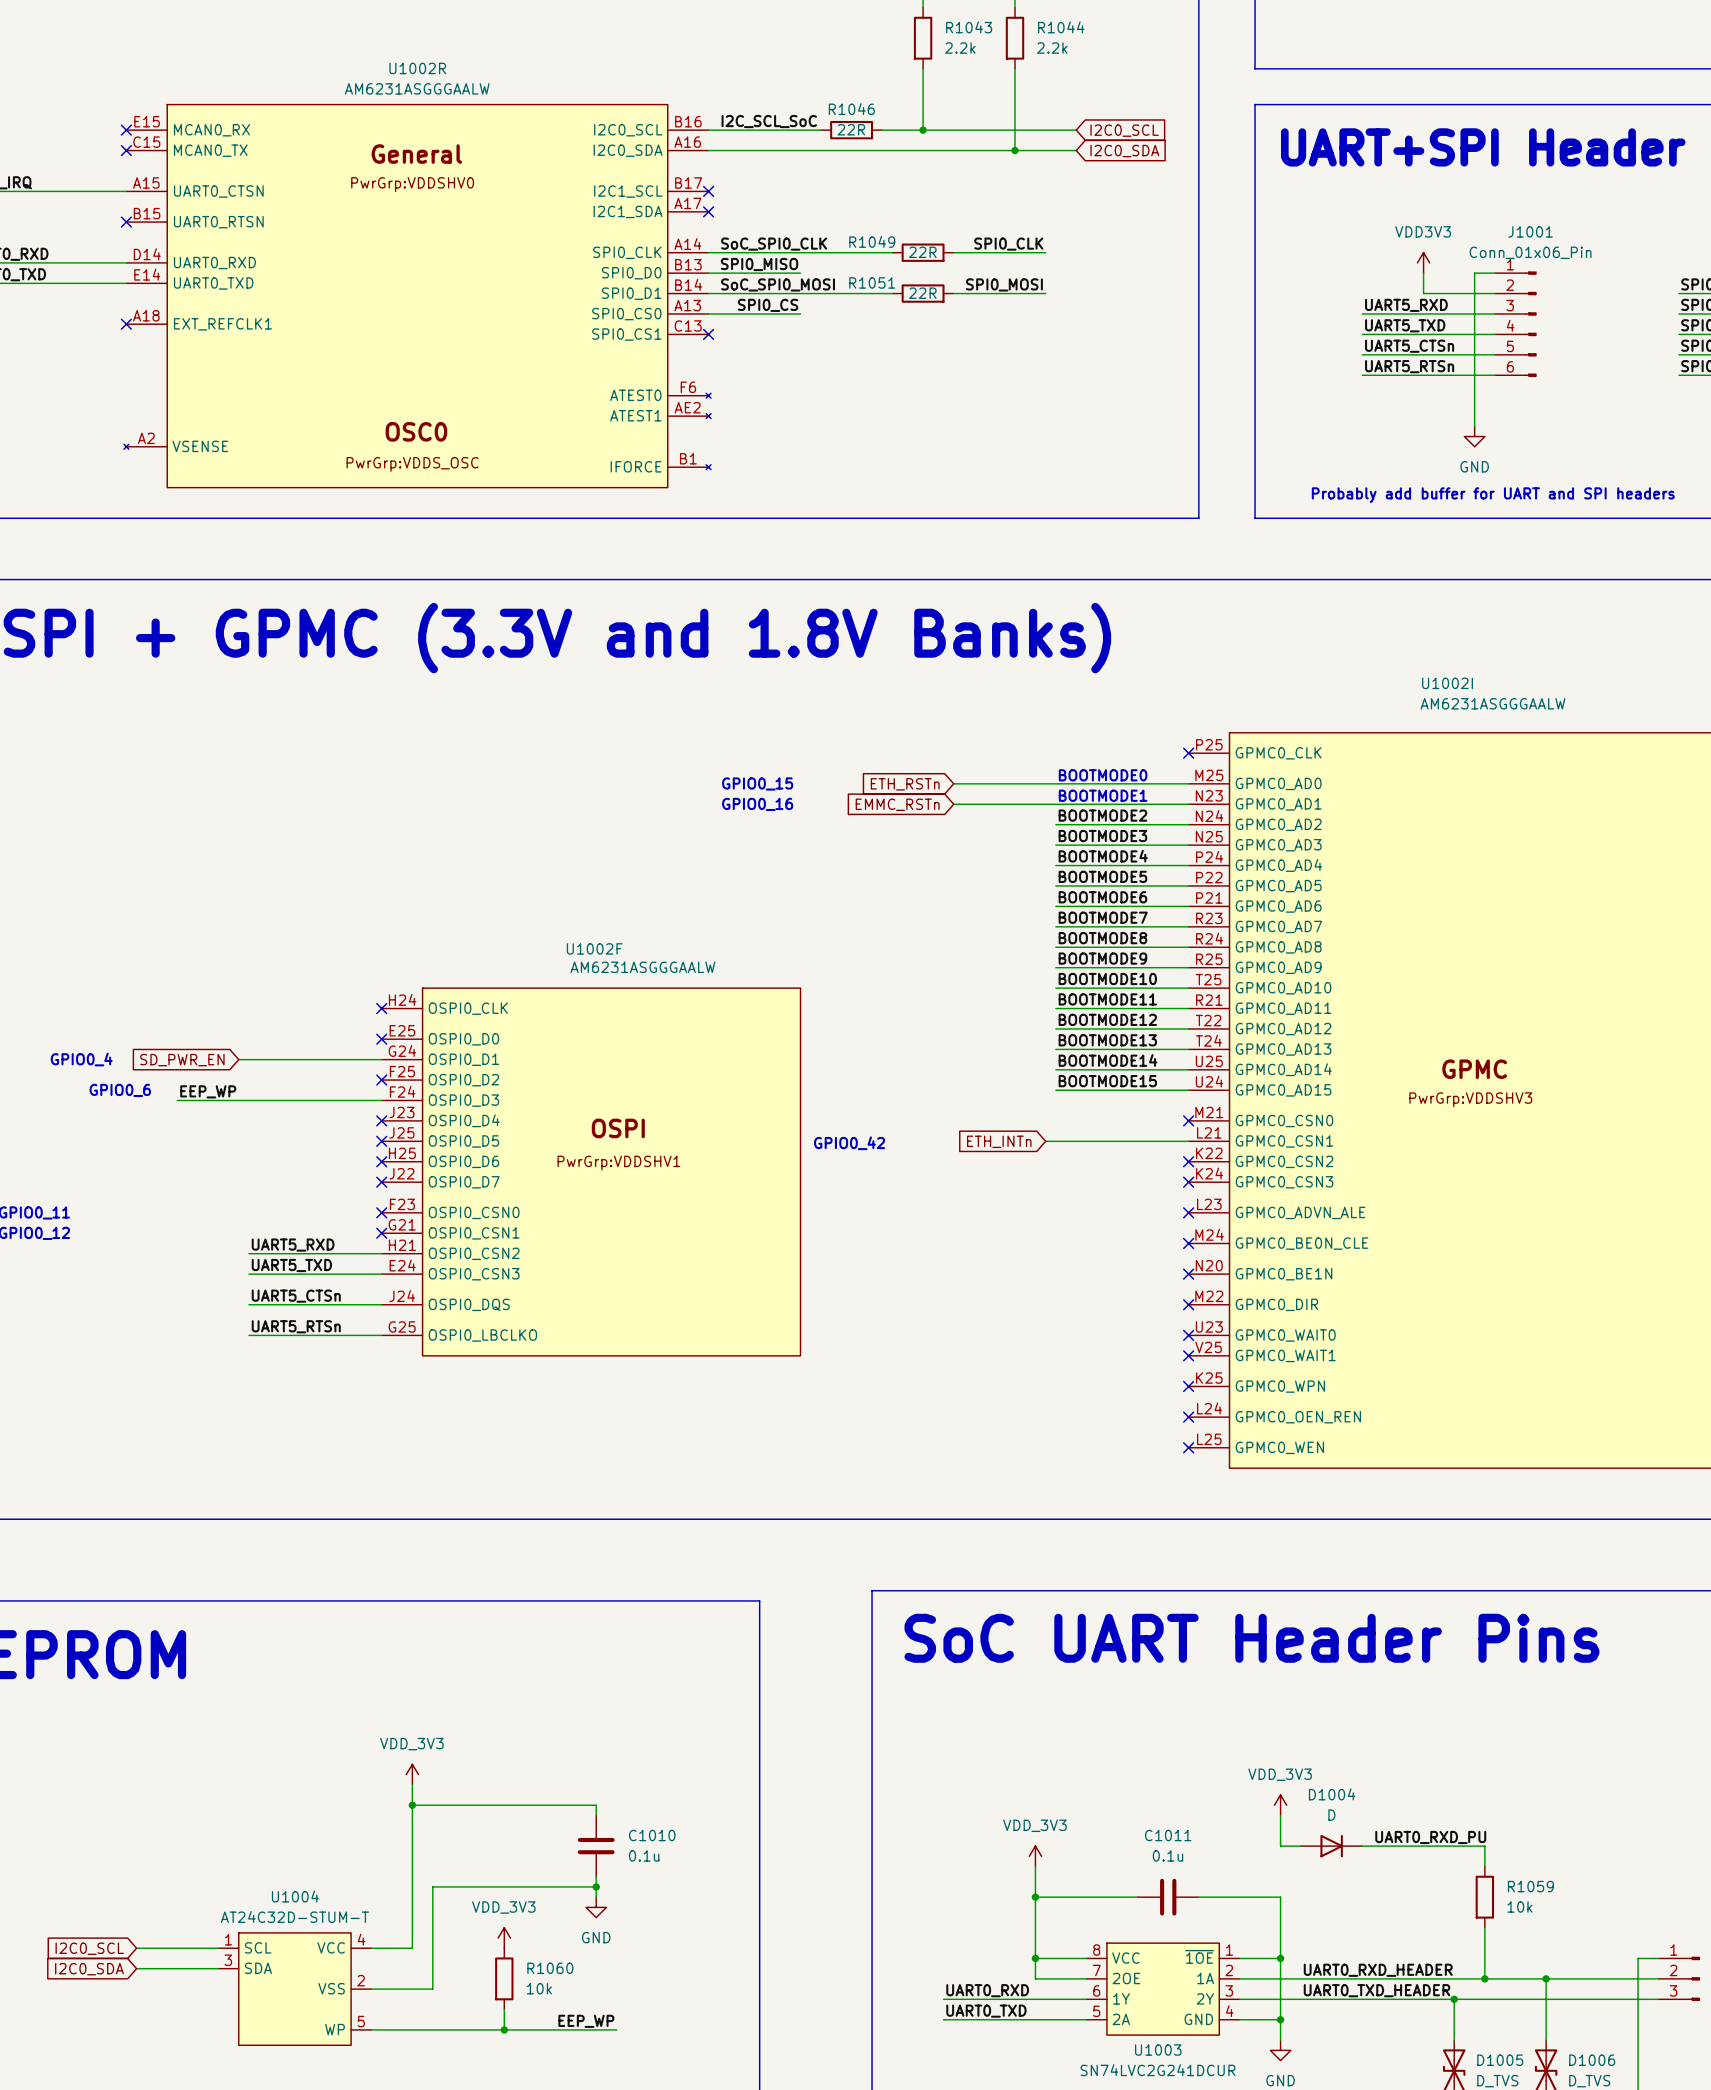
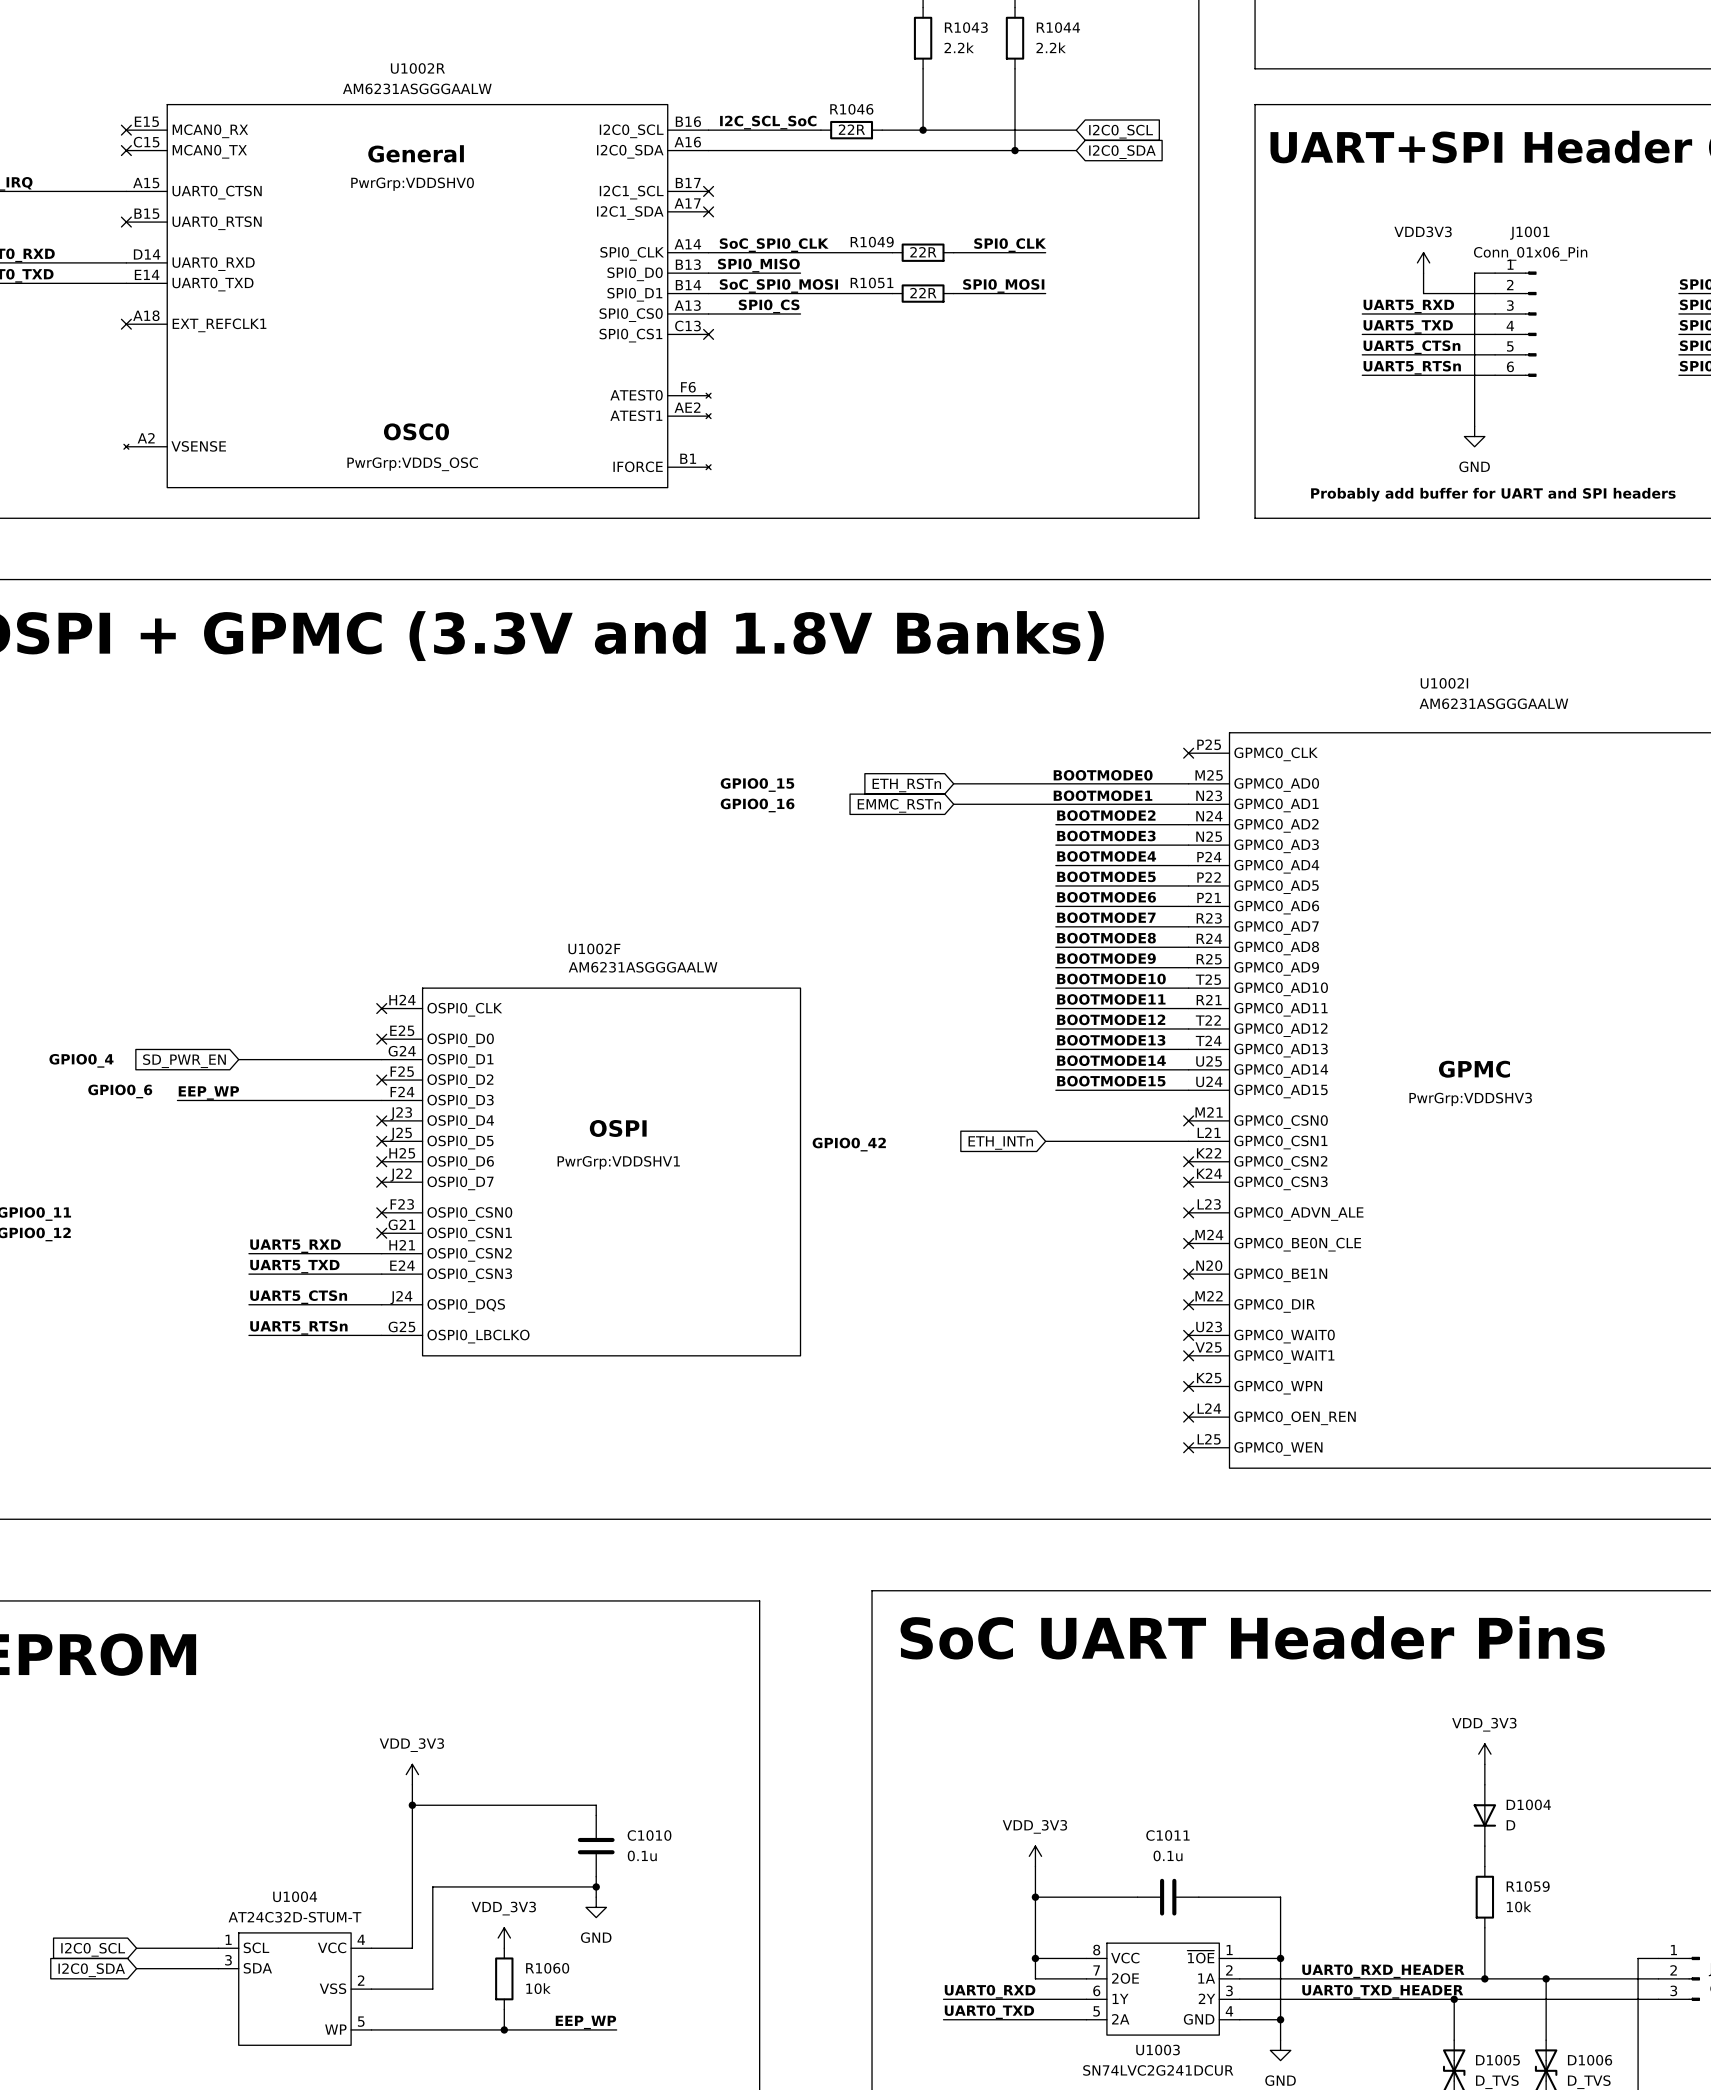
power symbol: none -> VDD_3V3 (1484, 1754)
wire: none -> (1484, 1764) (1484, 1784)
power symbol: VDD_3V3 (1280, 1805) -> none
wire: (1280, 1815) (1280, 1846) (1301, 1846) -> none
label: UART0_RXD_PU (1430, 1837) -> none
D1004 rotation: 0° (1331, 1846) -> 90° clockwise (1484, 1815)
D1004 position: (1331, 1846) -> (1484, 1815)
wire: (1362, 1846) (1484, 1846) -> none

